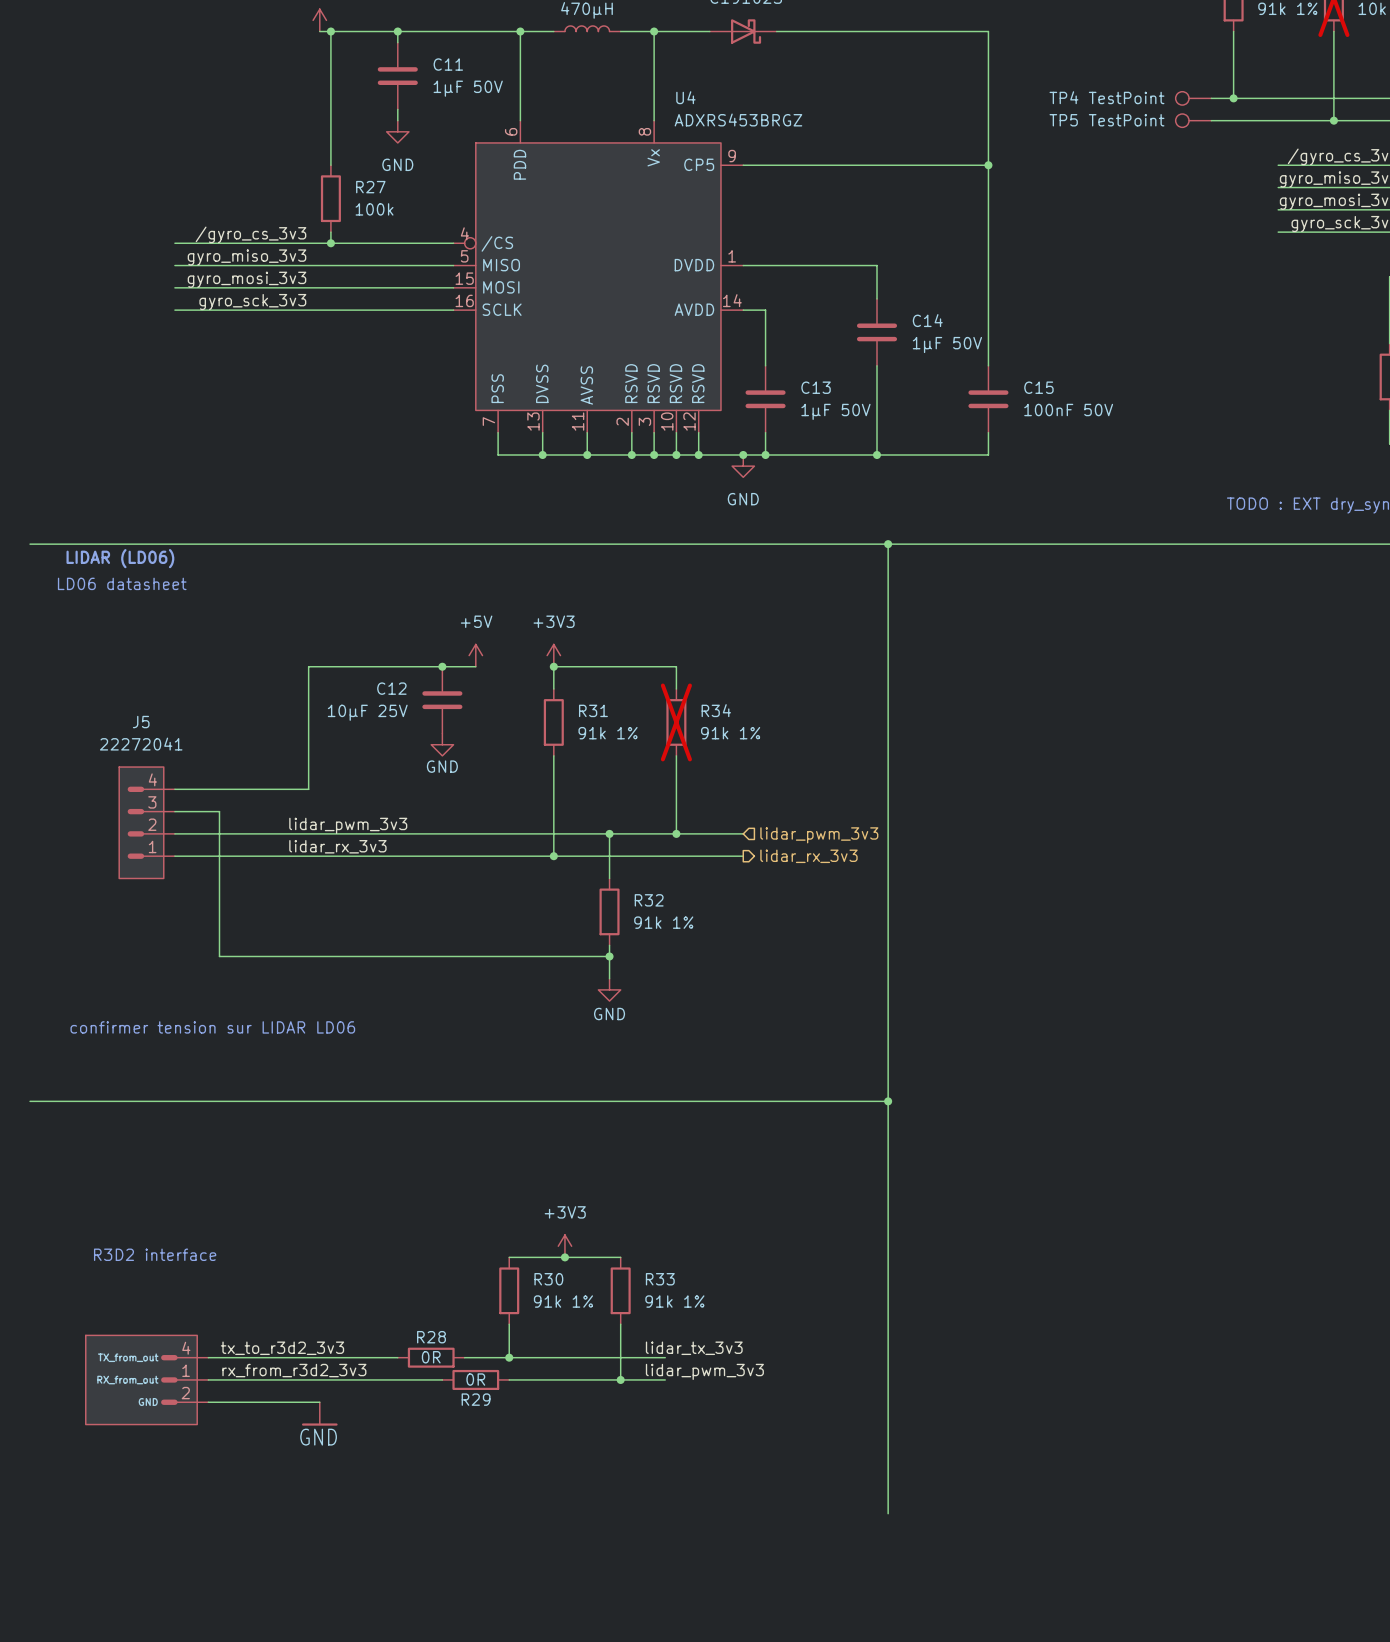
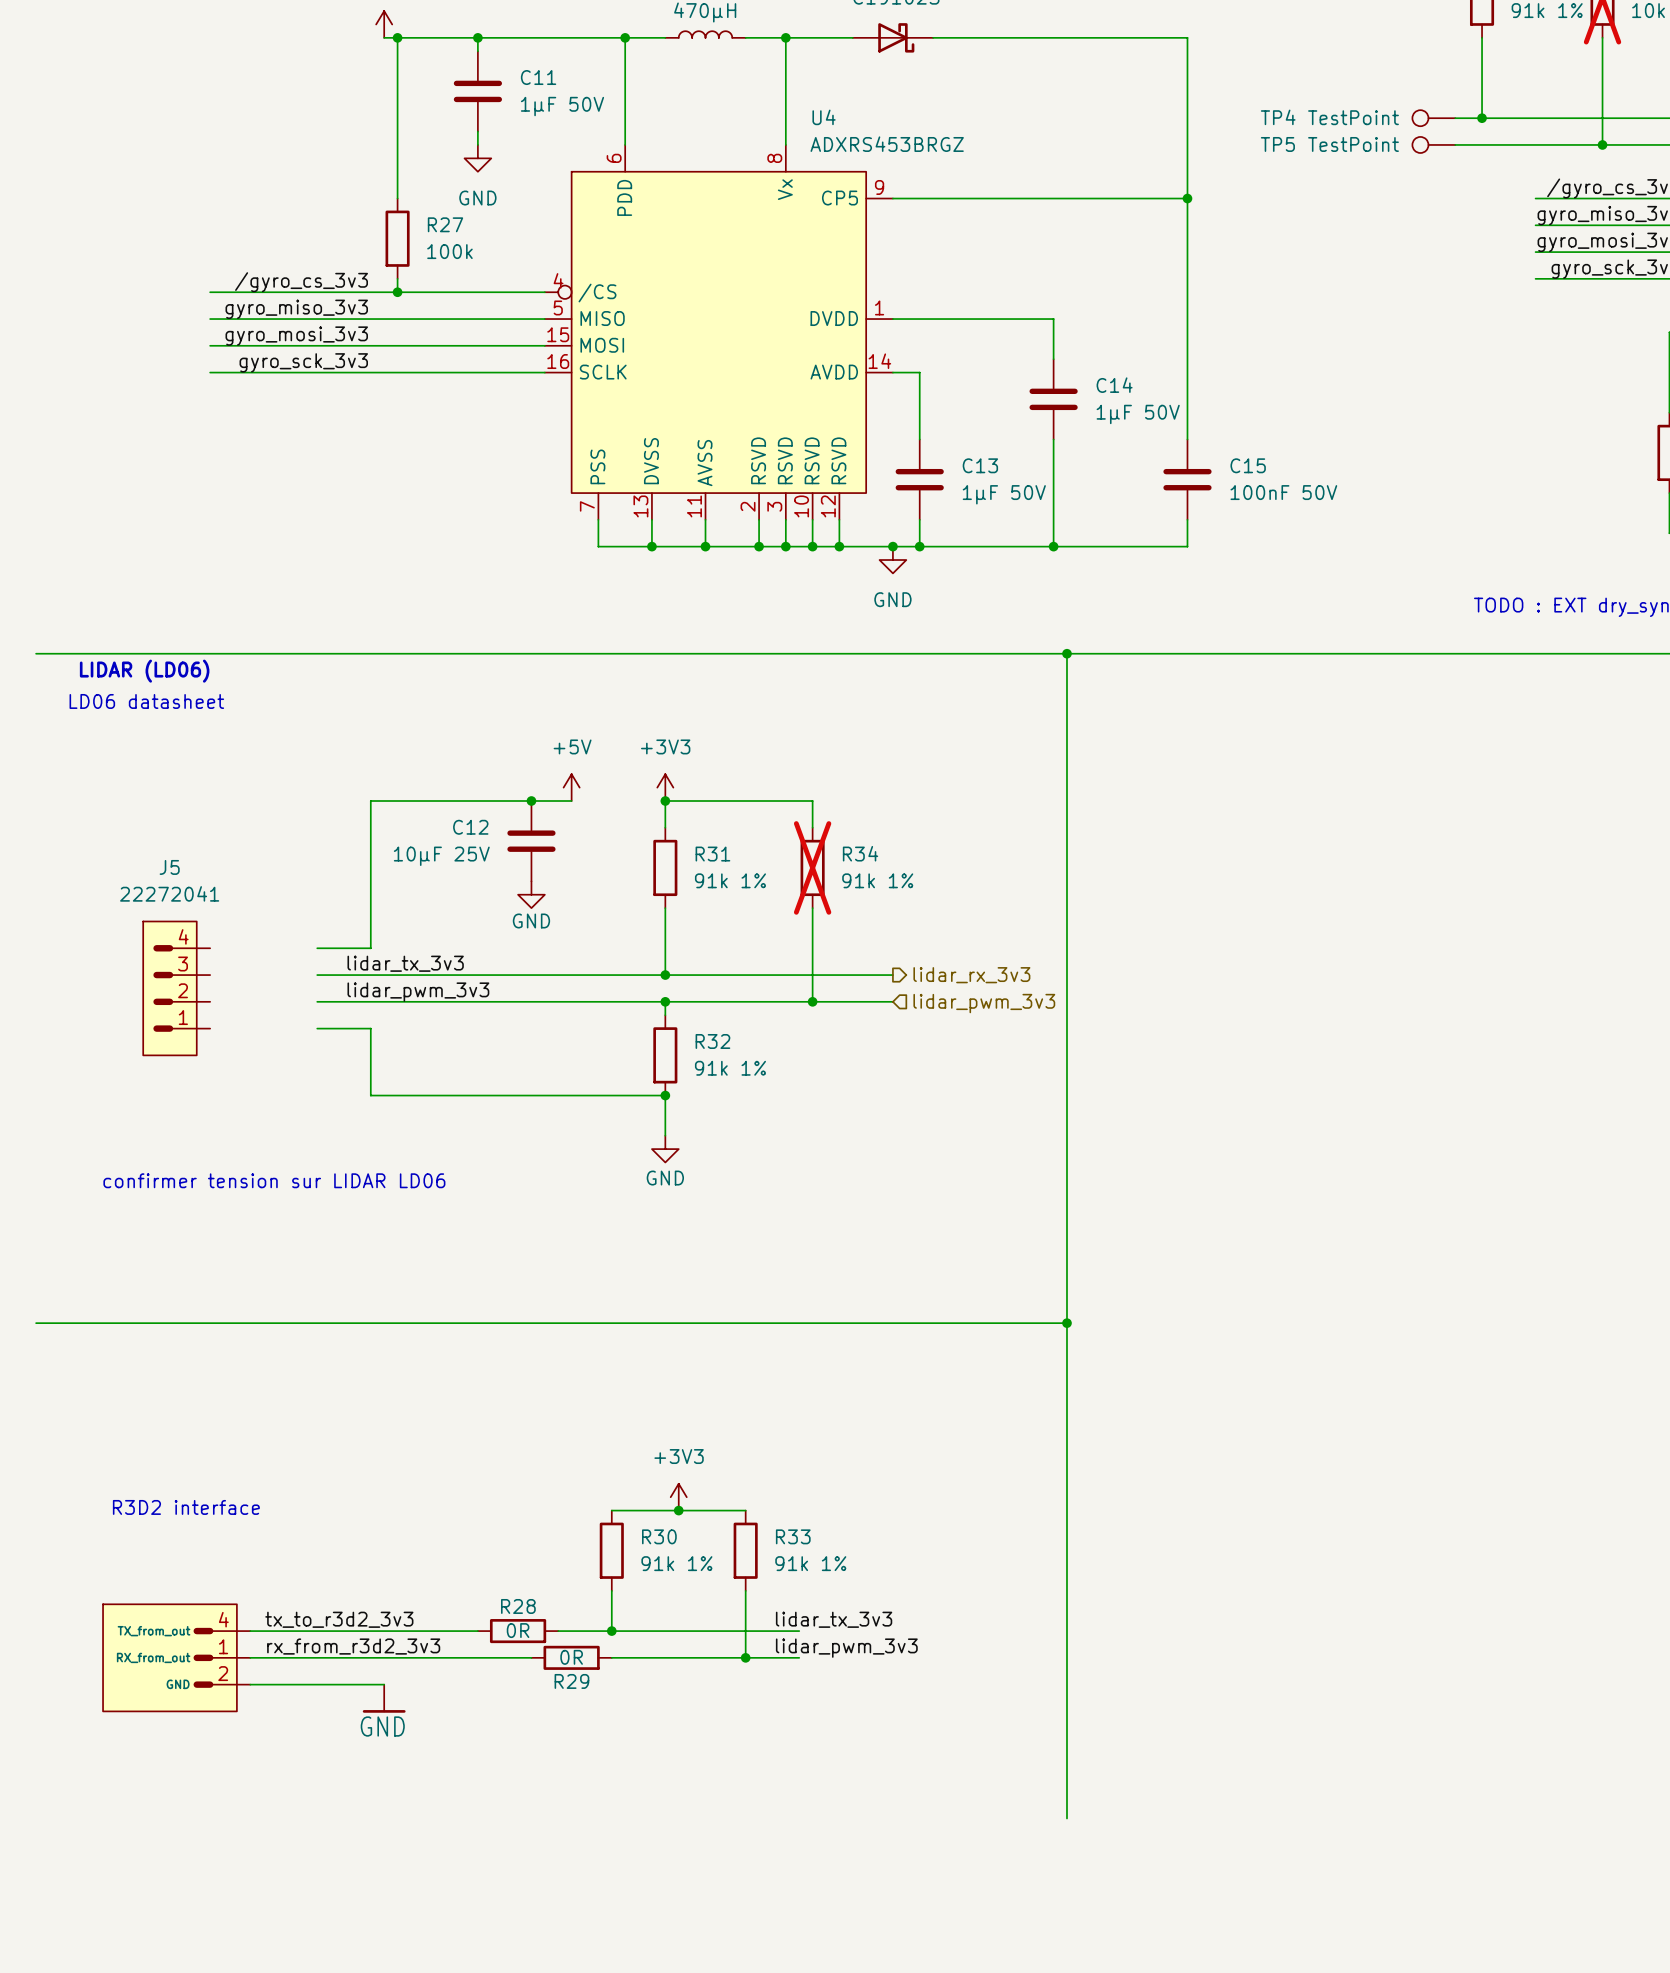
wire: (174, 789) (264, 789) -> none
label: none -> lidar_tx_3v3 (405, 963)
wire: (174, 811) (219, 811) (219, 956) (609, 956) -> none
wire: none -> (317, 975) (892, 975)
wire: (553, 811) (553, 833) -> none
junction: none -> (665, 975)
wire: (174, 833) (264, 833) -> none
junction: none -> (665, 1001)
wire: (609, 833) (609, 878) -> none
junction: (609, 833) -> none
label: lidar_rx_3v3 (337, 846) -> none
wire: (174, 856) (264, 856) -> none
wire: (308, 856) (743, 856) -> (370, 1028) (370, 1095) (665, 1095) (665, 1135)
junction: (553, 856) -> none
hierarchical label position: lidar_rx_3v3 (808, 856) -> lidar_rx_3v3 (971, 975)
junction: none -> (665, 1095)
R32 position: (609, 911) -> (665, 1055)
wire: (609, 945) (609, 978) -> none
junction: (609, 956) -> none
power symbol position: GND (609, 989) -> GND (665, 1149)
text position: confirmer tension sur LIDAR LD06 (212, 1027) -> confirmer tension sur LIDAR LD06 (274, 1180)

